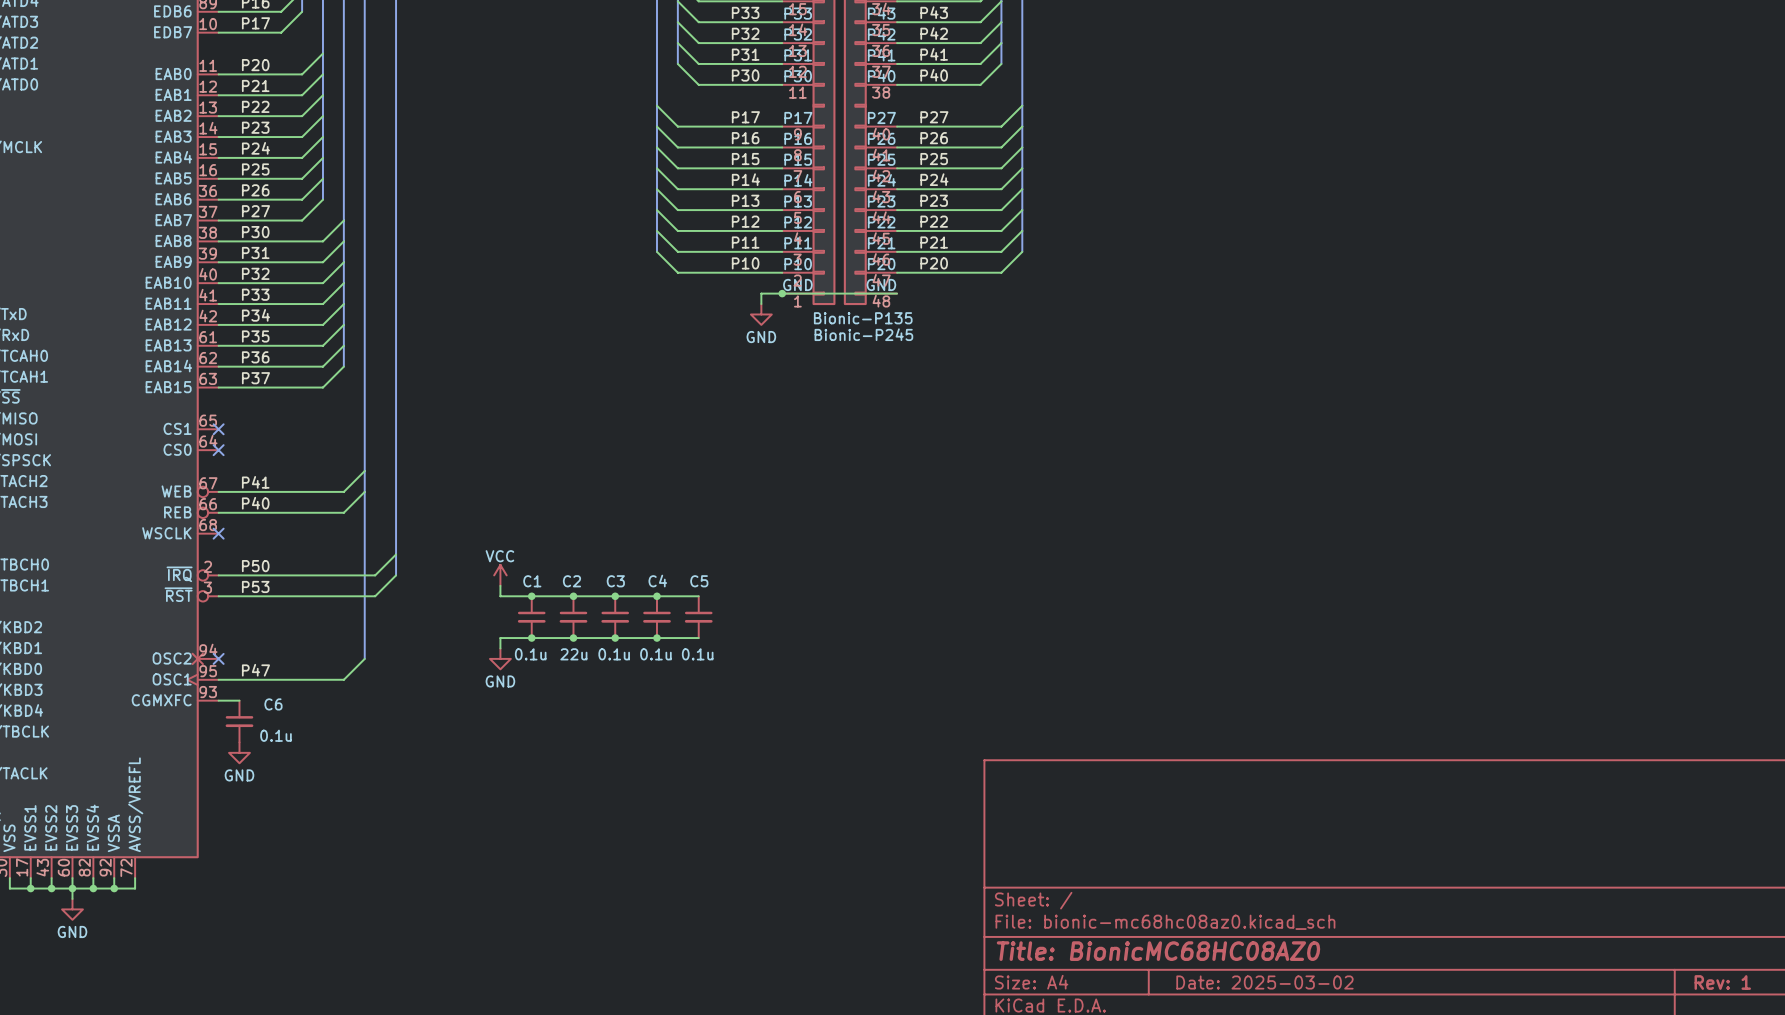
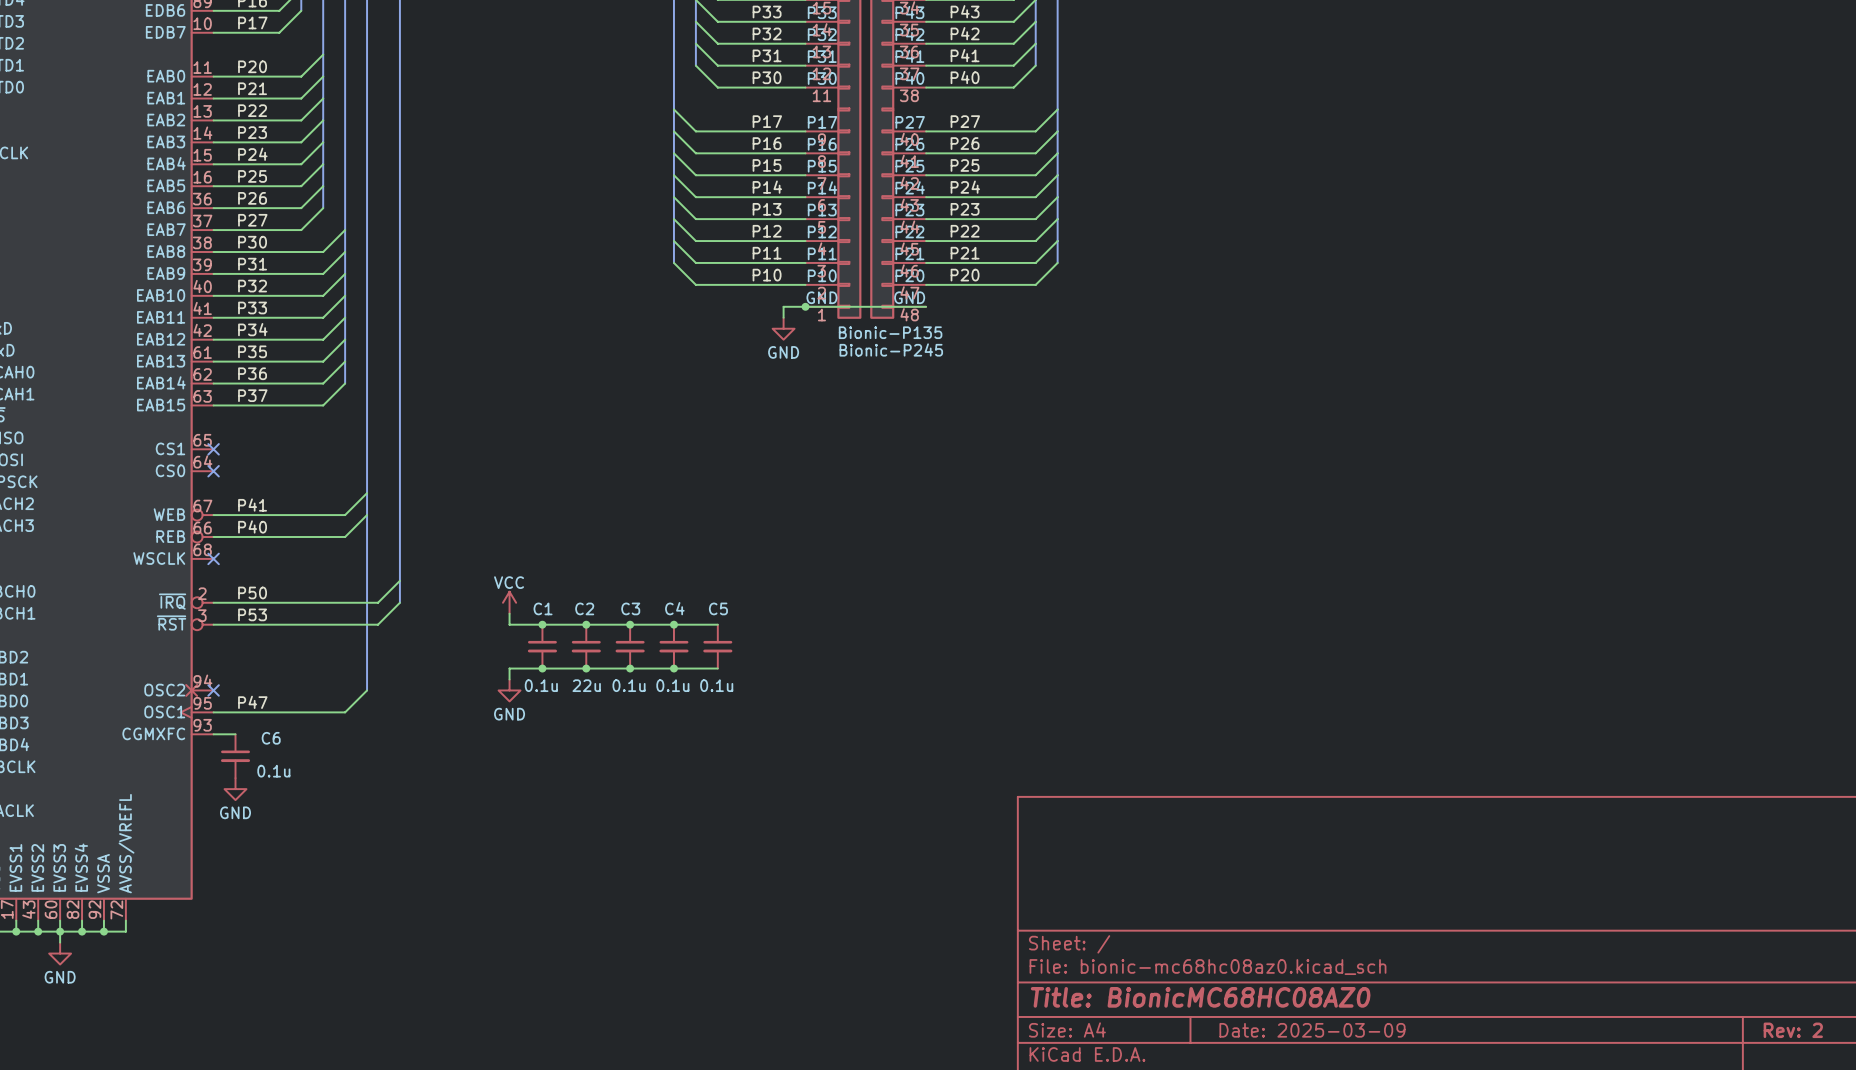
title block: Date: 2025-03-02 (1264, 982) -> Date: 2025-03-09 (1312, 1030)
title block: Rev: 1 (1722, 982) -> Rev: 2 (1793, 1030)

